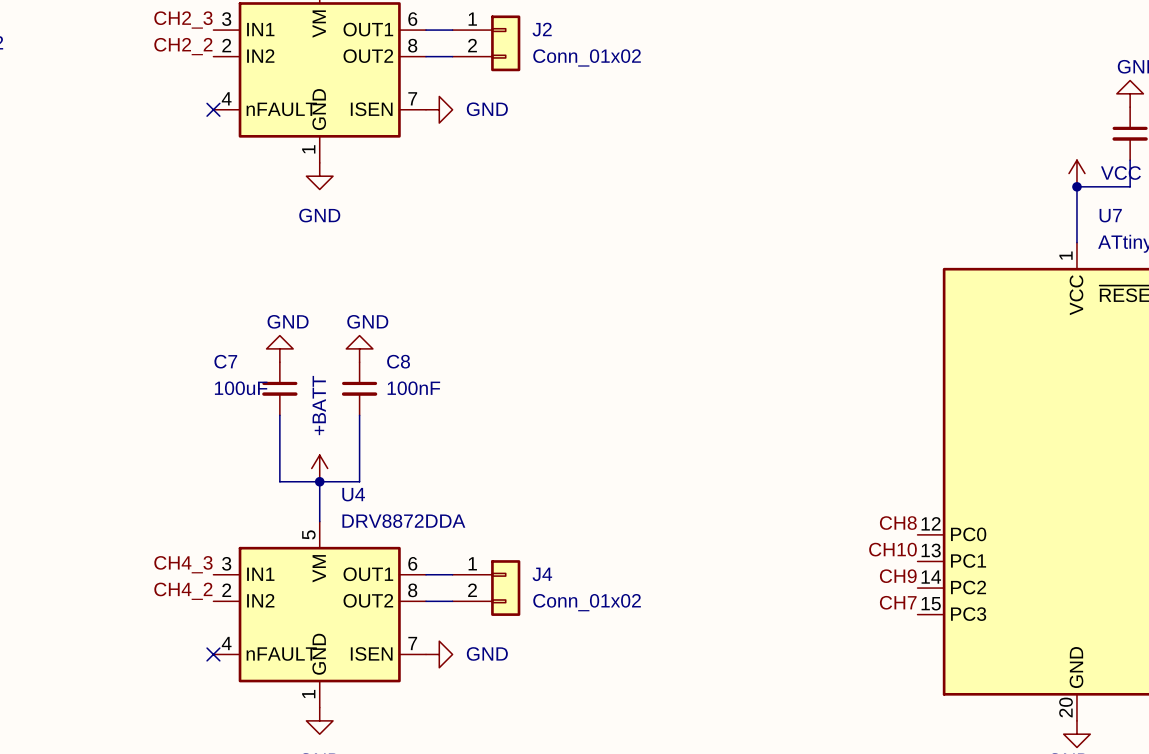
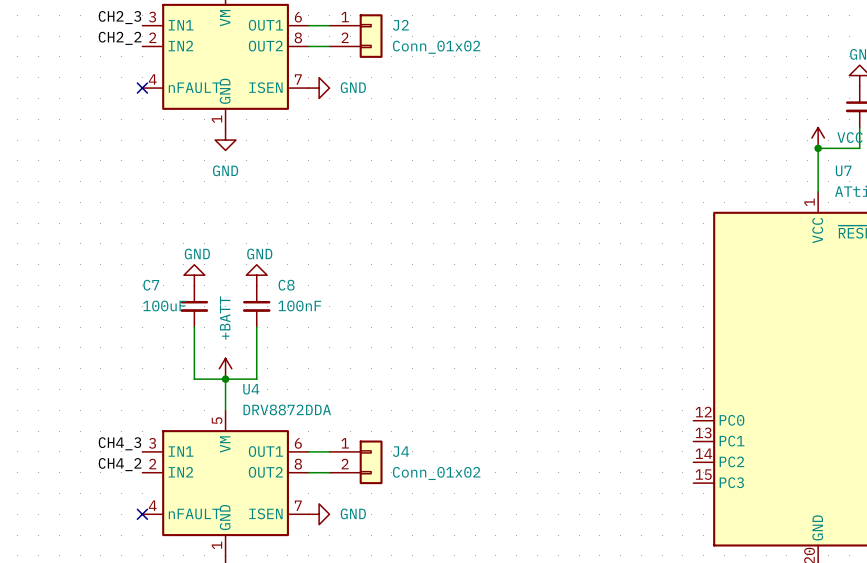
label: CH8 (898, 523) -> none
label: CH10 (892, 549) -> none
label: CH9 (898, 576) -> none
label: CH7 (898, 602) -> none

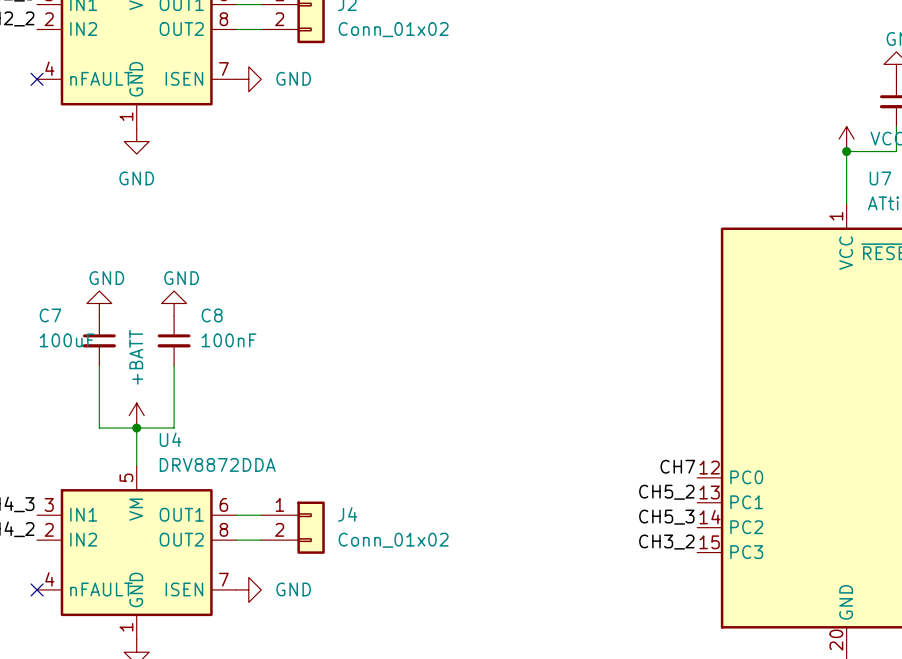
label: none -> CH7 (677, 466)
label: none -> CH5_2 (666, 492)
label: none -> CH5_3 (666, 517)
label: none -> CH3_2 (666, 542)

